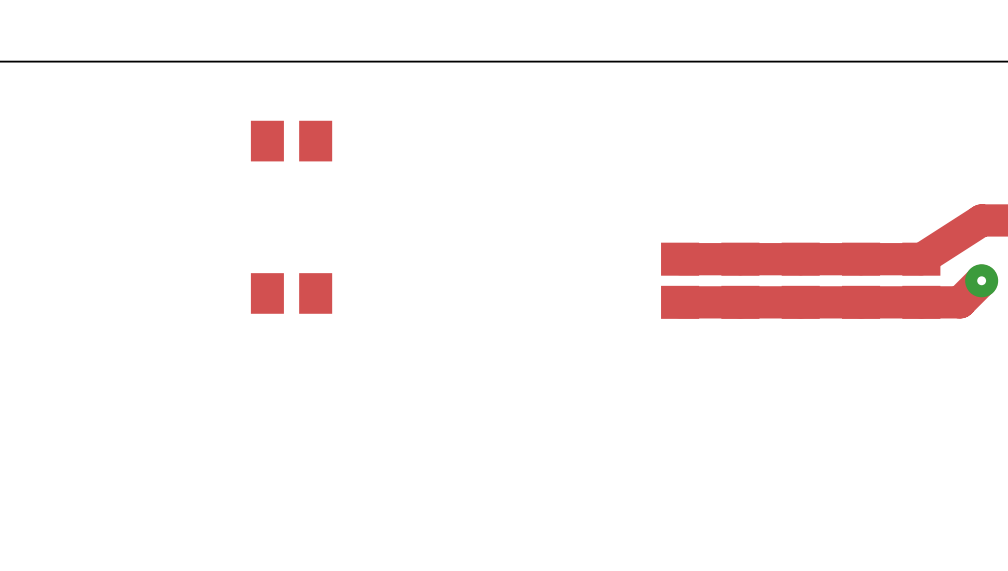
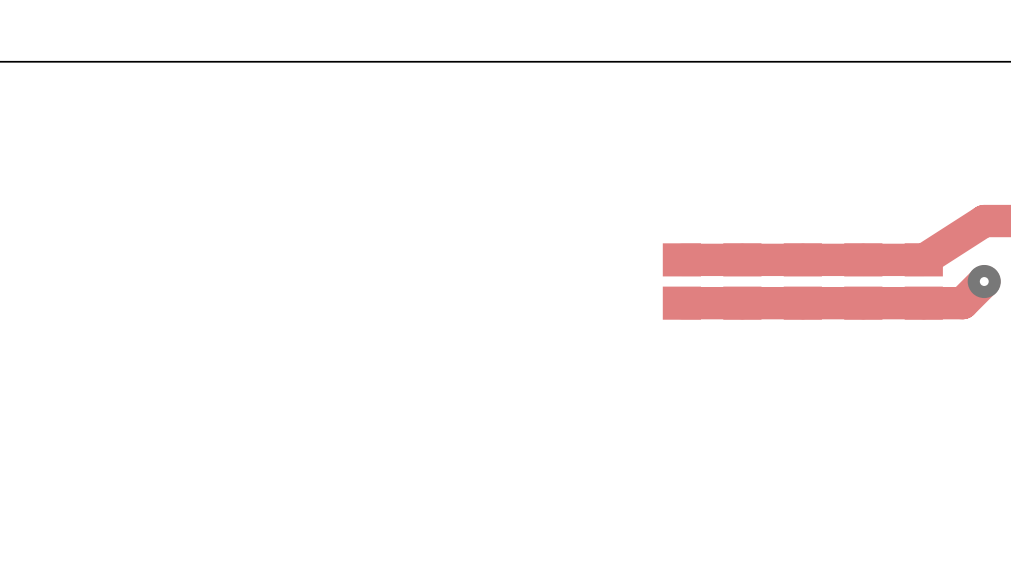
part: (291, 141) -> none
part: (291, 293) -> none

